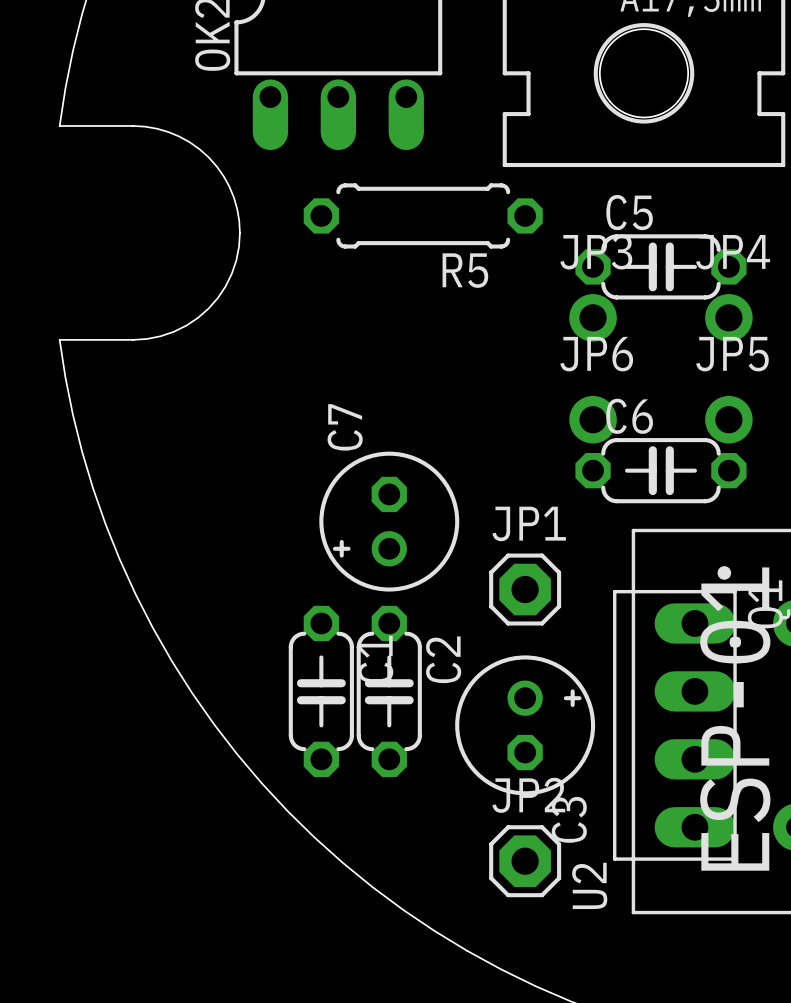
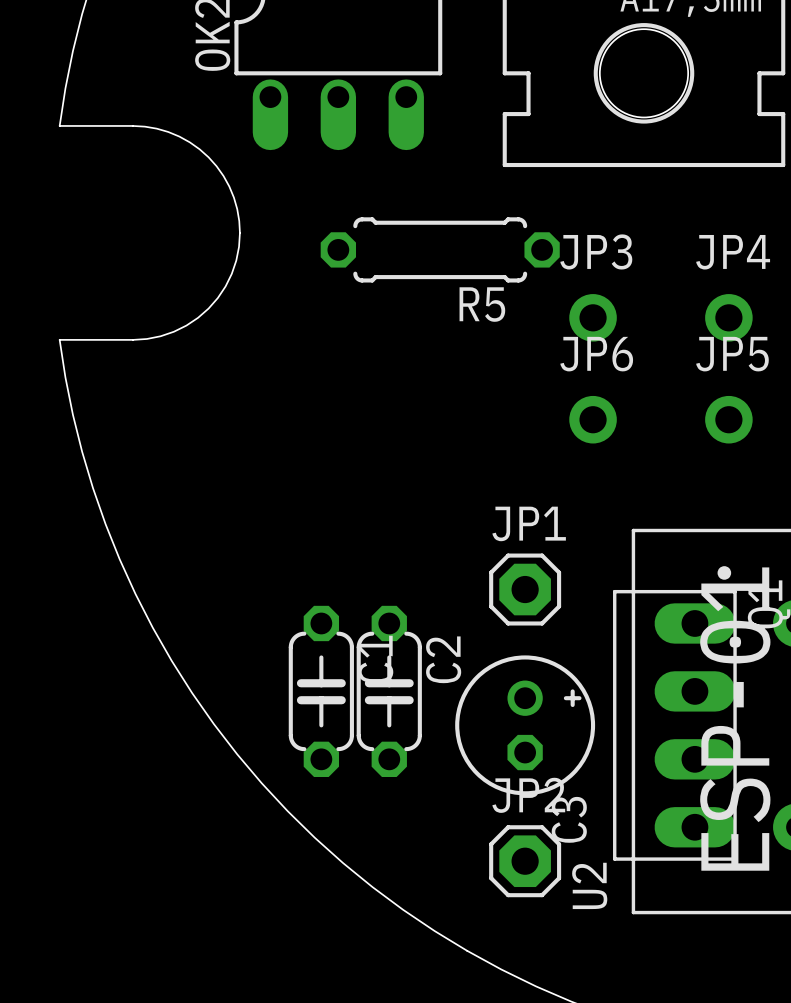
R5 position: (423, 215) -> (440, 249)
C5: (660, 266) -> none
C6: (660, 470) -> none
C7: (389, 521) -> none

